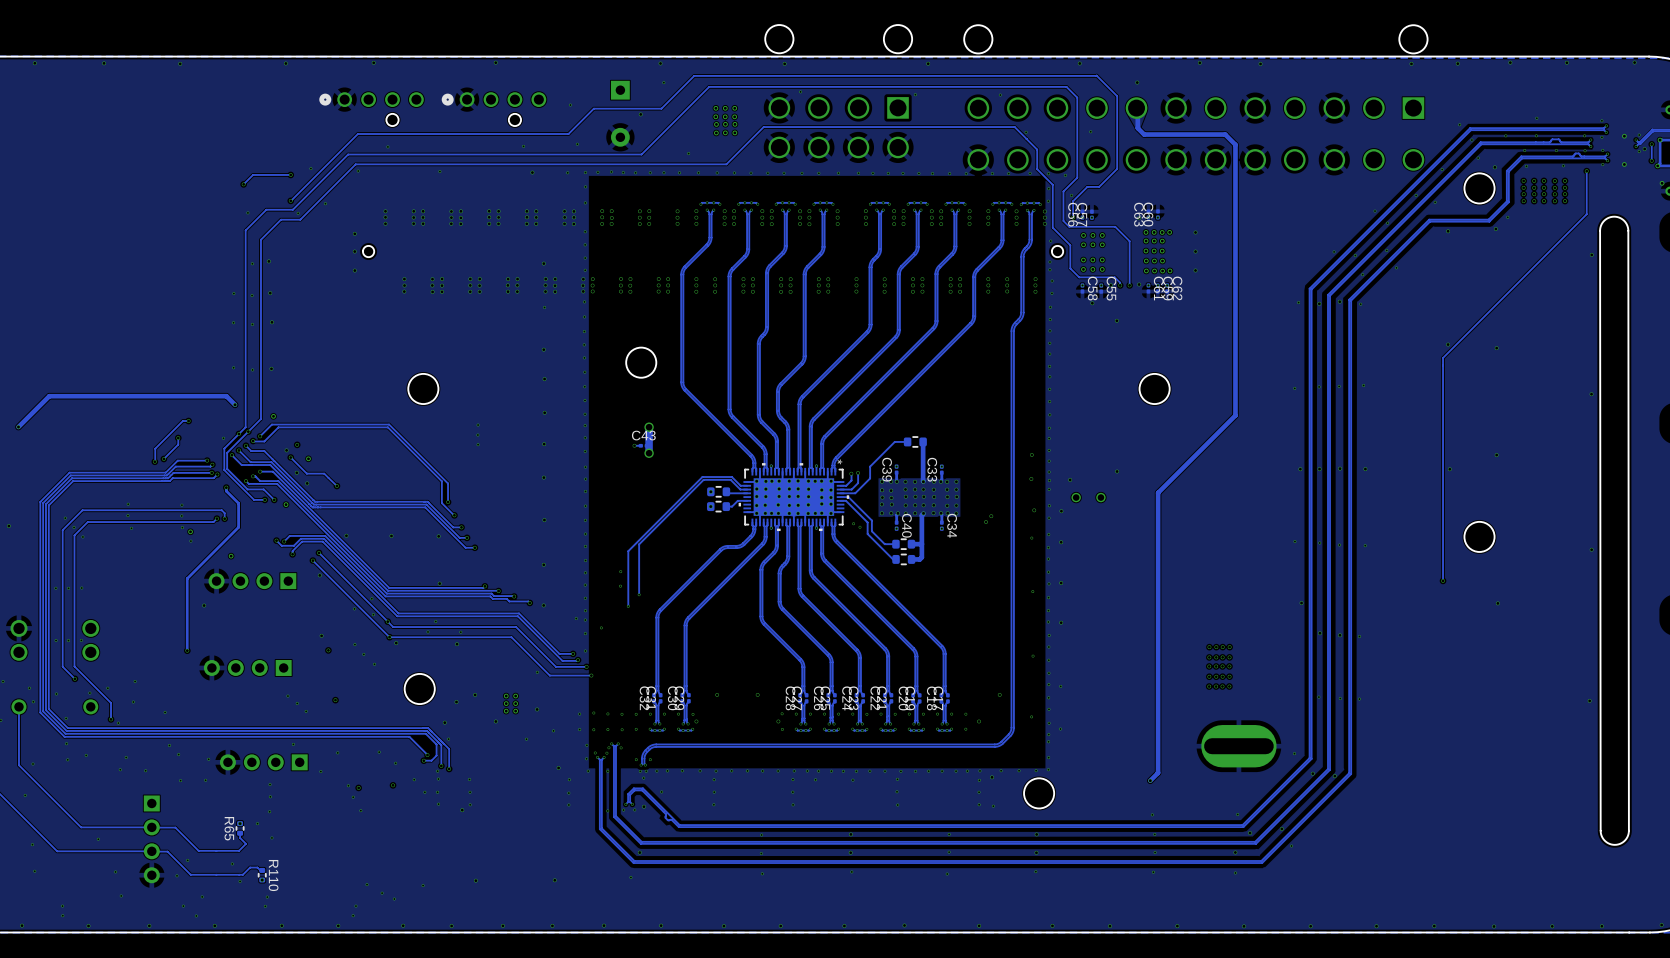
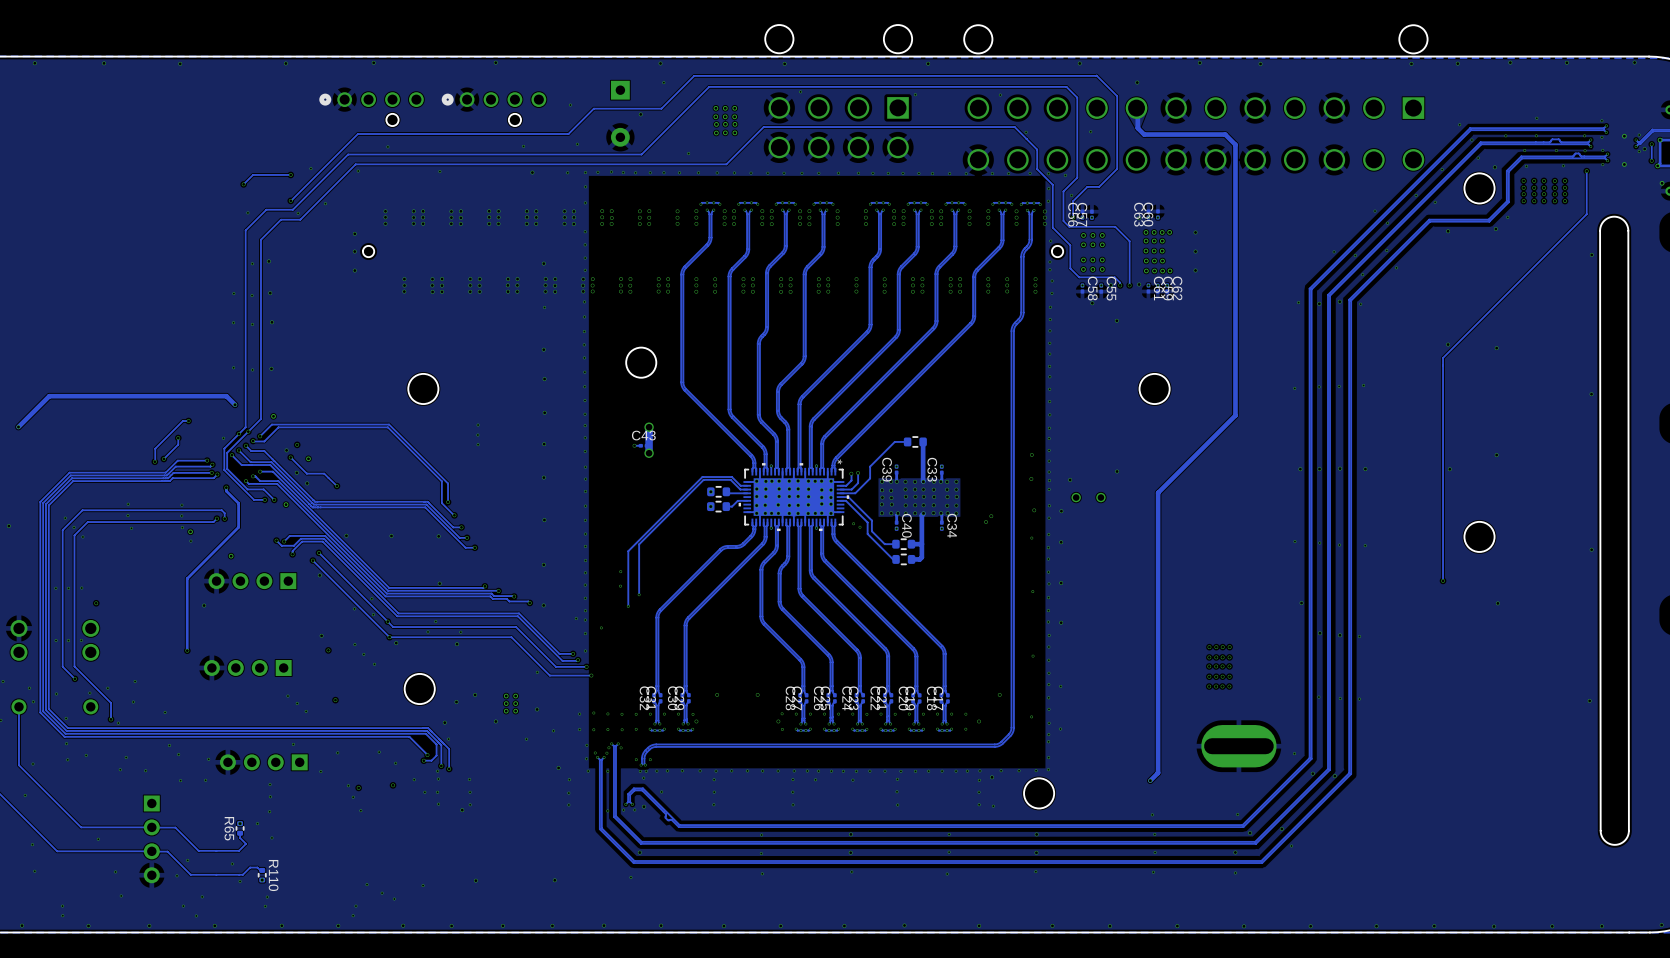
via: none -> (96, 603)

